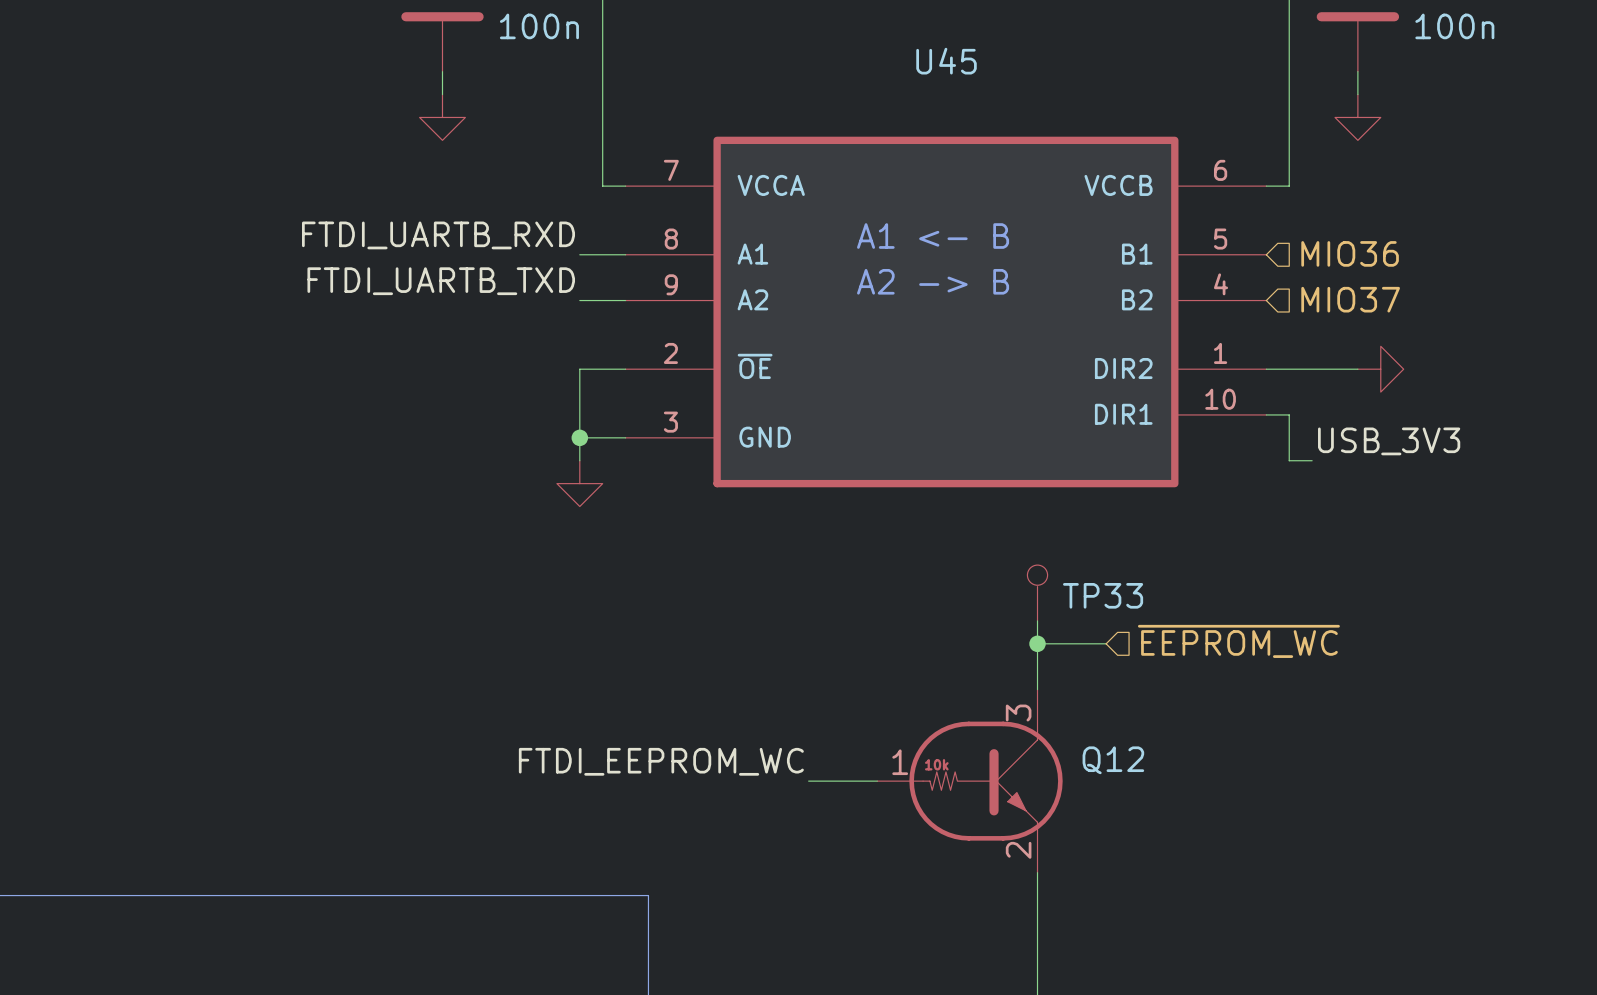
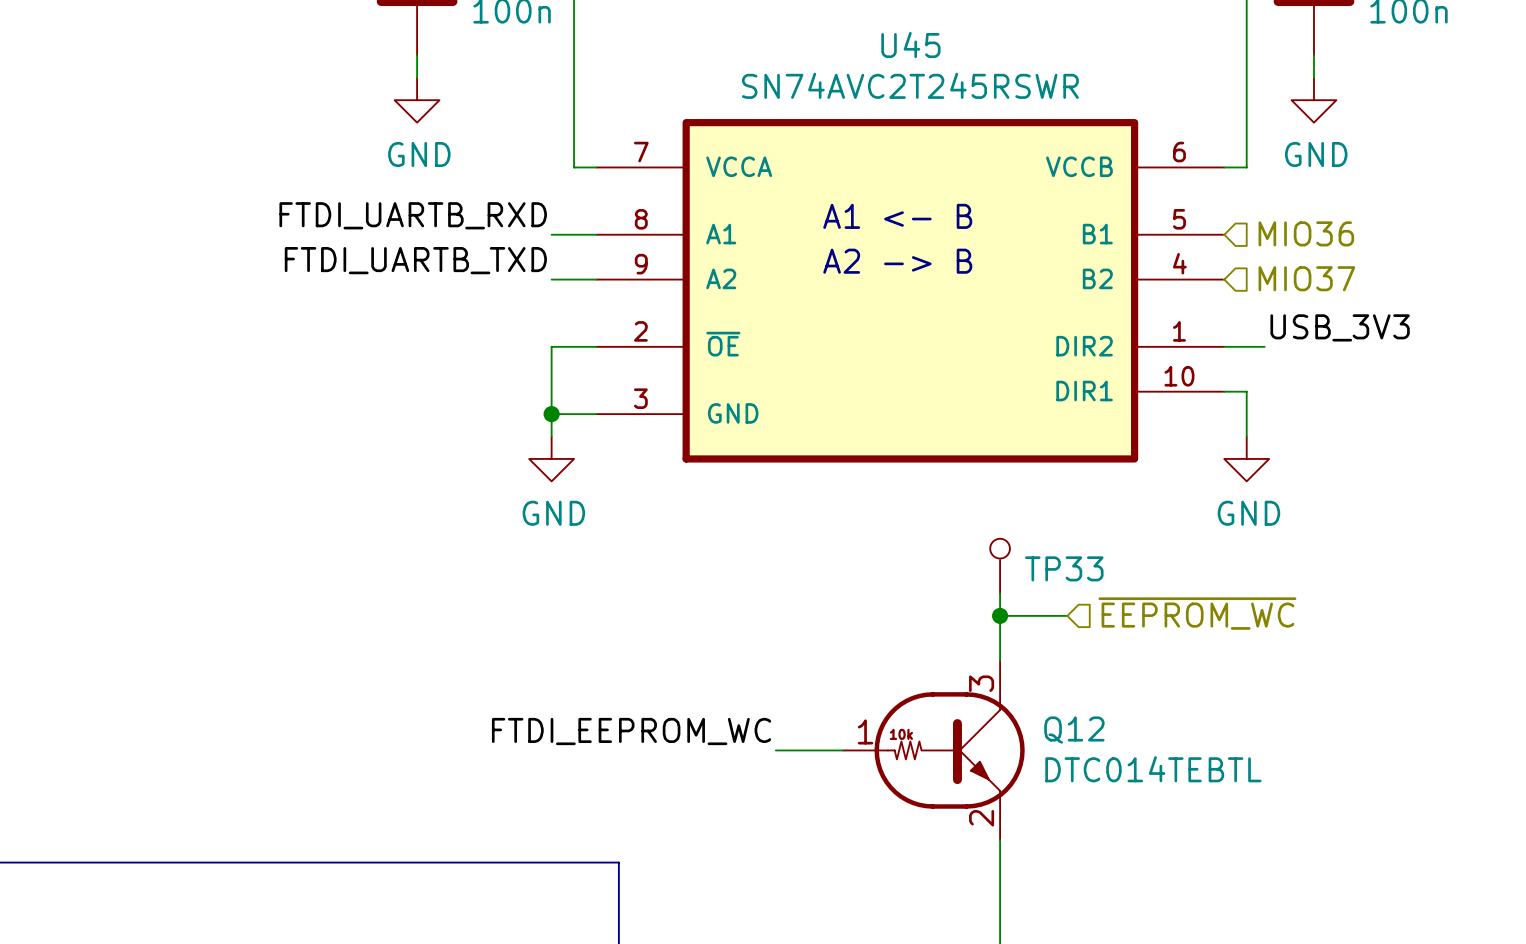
U45 value: none -> SN74AVC2T245RSWR (910, 85)
power symbol text: none -> GND (419, 154)
power symbol text: none -> GND (1316, 154)
wire: (1307, 369) (1357, 369) -> none
power symbol: (1380, 369) -> none
label position: USB_3V3 (1389, 441) -> USB_3V3 (1340, 327)
wire: (1289, 460) (1312, 460) -> none
power symbol: none -> GND (1246, 458)
power symbol text: none -> GND (553, 513)
Q12 value: none -> DTC014TEBTL (1153, 769)

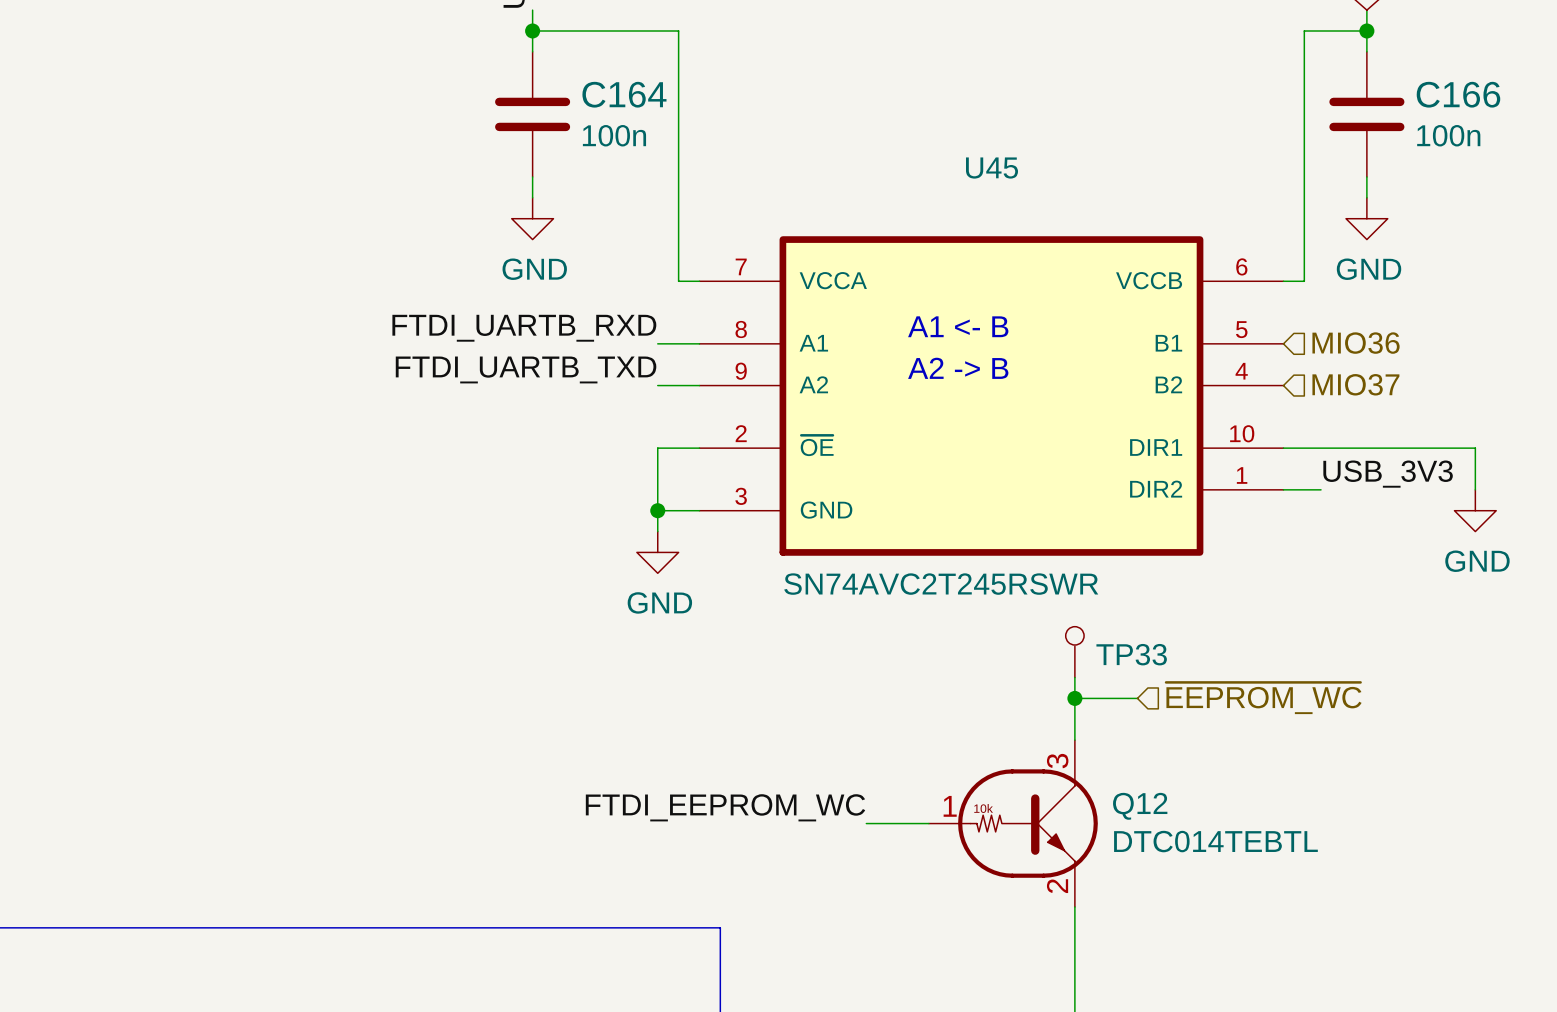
U45 value position: SN74AVC2T245RSWR (910, 85) -> SN74AVC2T245RSWR (941, 584)
label position: USB_3V3 (1340, 327) -> USB_3V3 (1388, 474)
U45 pin number: 1 (1179, 331) -> 10 (1242, 433)
U45 pin name: DIR2 (1084, 346) -> DIR1 (1156, 447)
wire: none -> (1321, 448) (1475, 448) (1475, 489)
U45 pin number: 10 (1179, 376) -> 1 (1242, 475)
U45 pin name: DIR1 (1084, 391) -> DIR2 (1156, 489)
wire: (1246, 391) (1246, 436) -> (1304, 489) (1321, 489)
power symbol position: GND (1246, 458) -> GND (1475, 510)

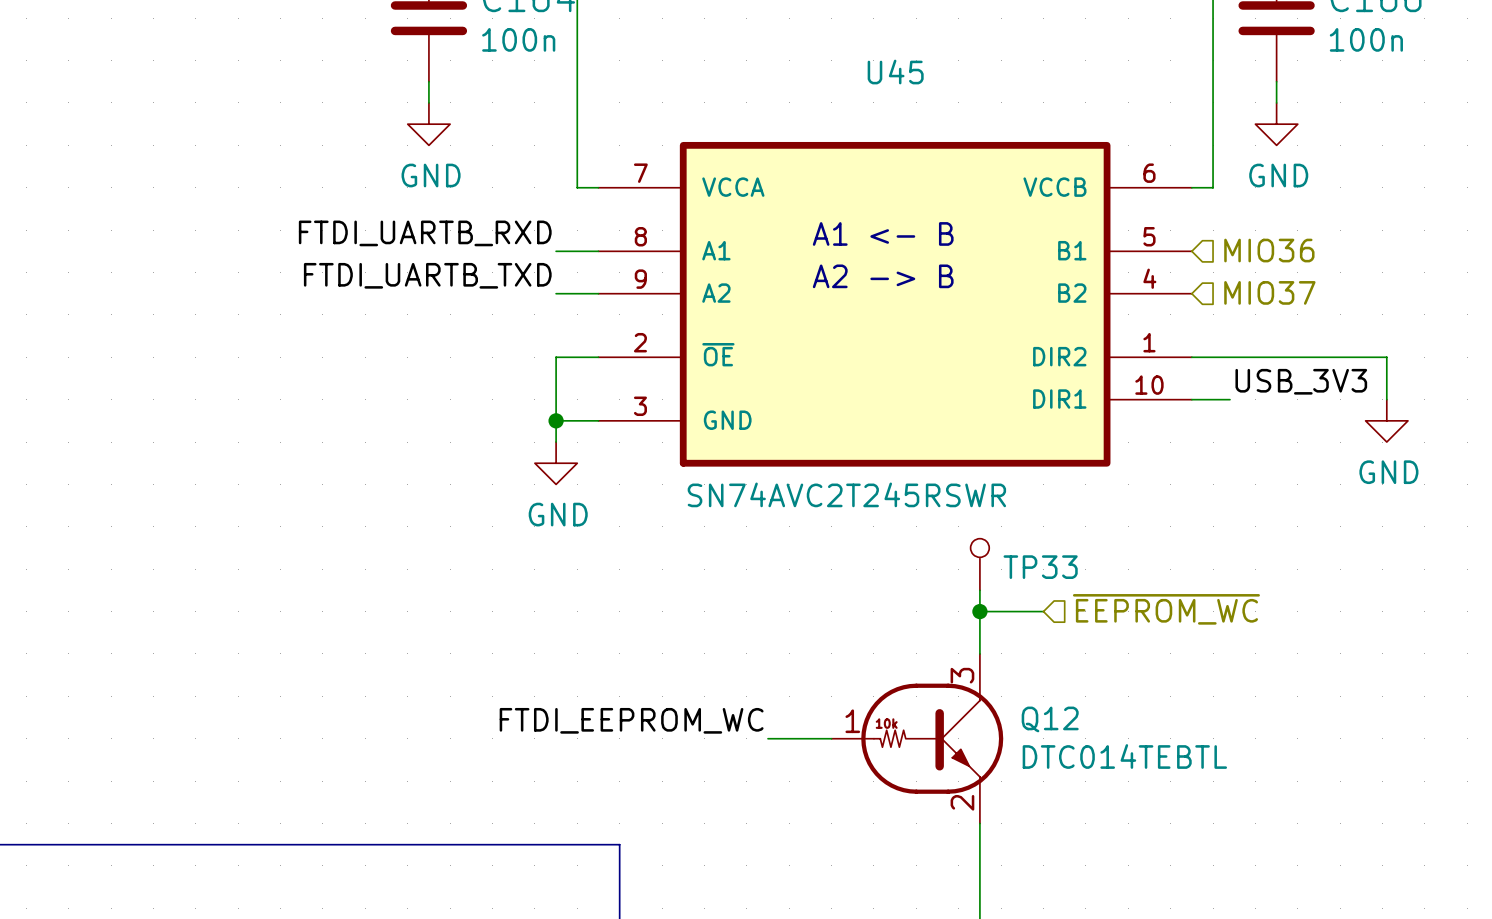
U45 pin number: 10 (1242, 433) -> 1 (1149, 342)
U45 pin name: DIR1 (1156, 447) -> DIR2 (1059, 356)
U45 pin number: 1 (1242, 475) -> 10 (1149, 385)
U45 pin name: DIR2 (1156, 489) -> DIR1 (1059, 399)

